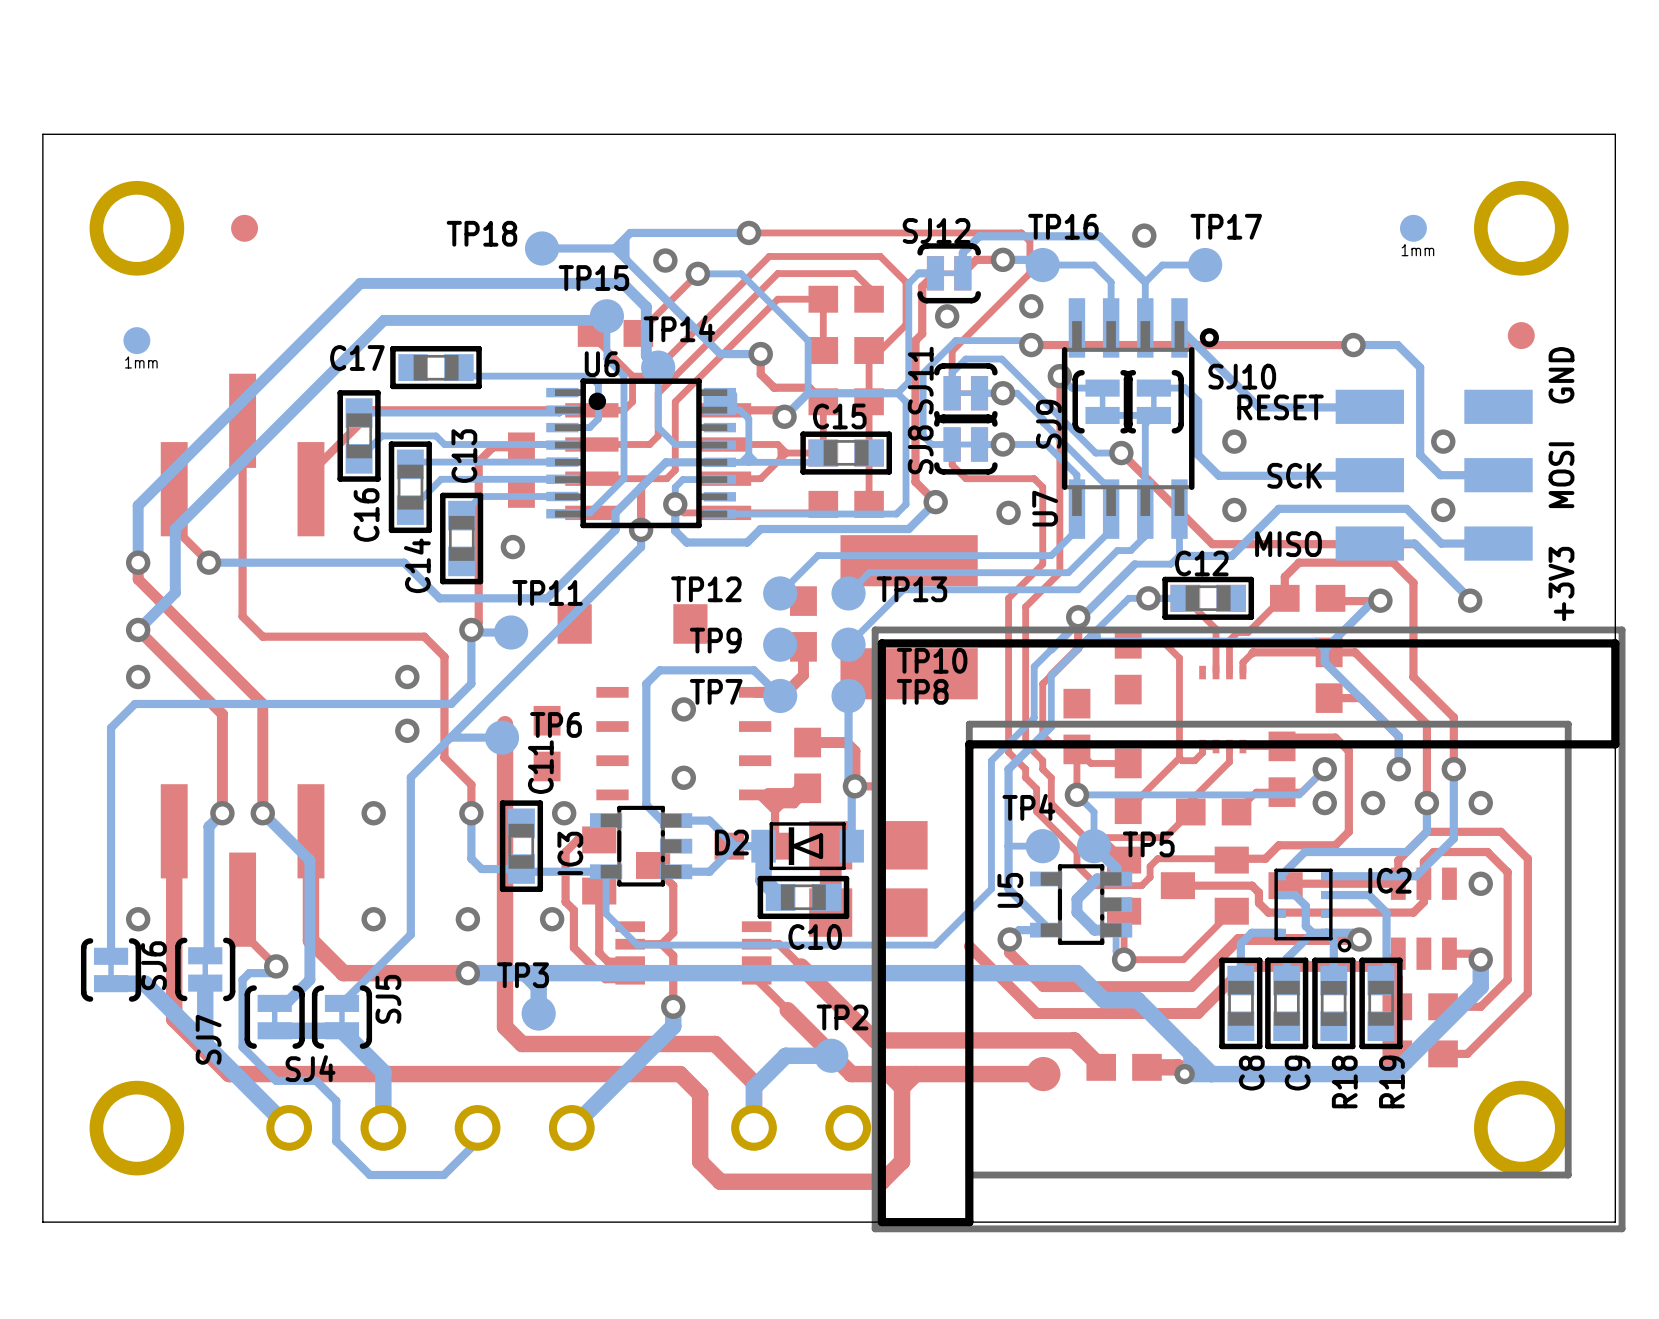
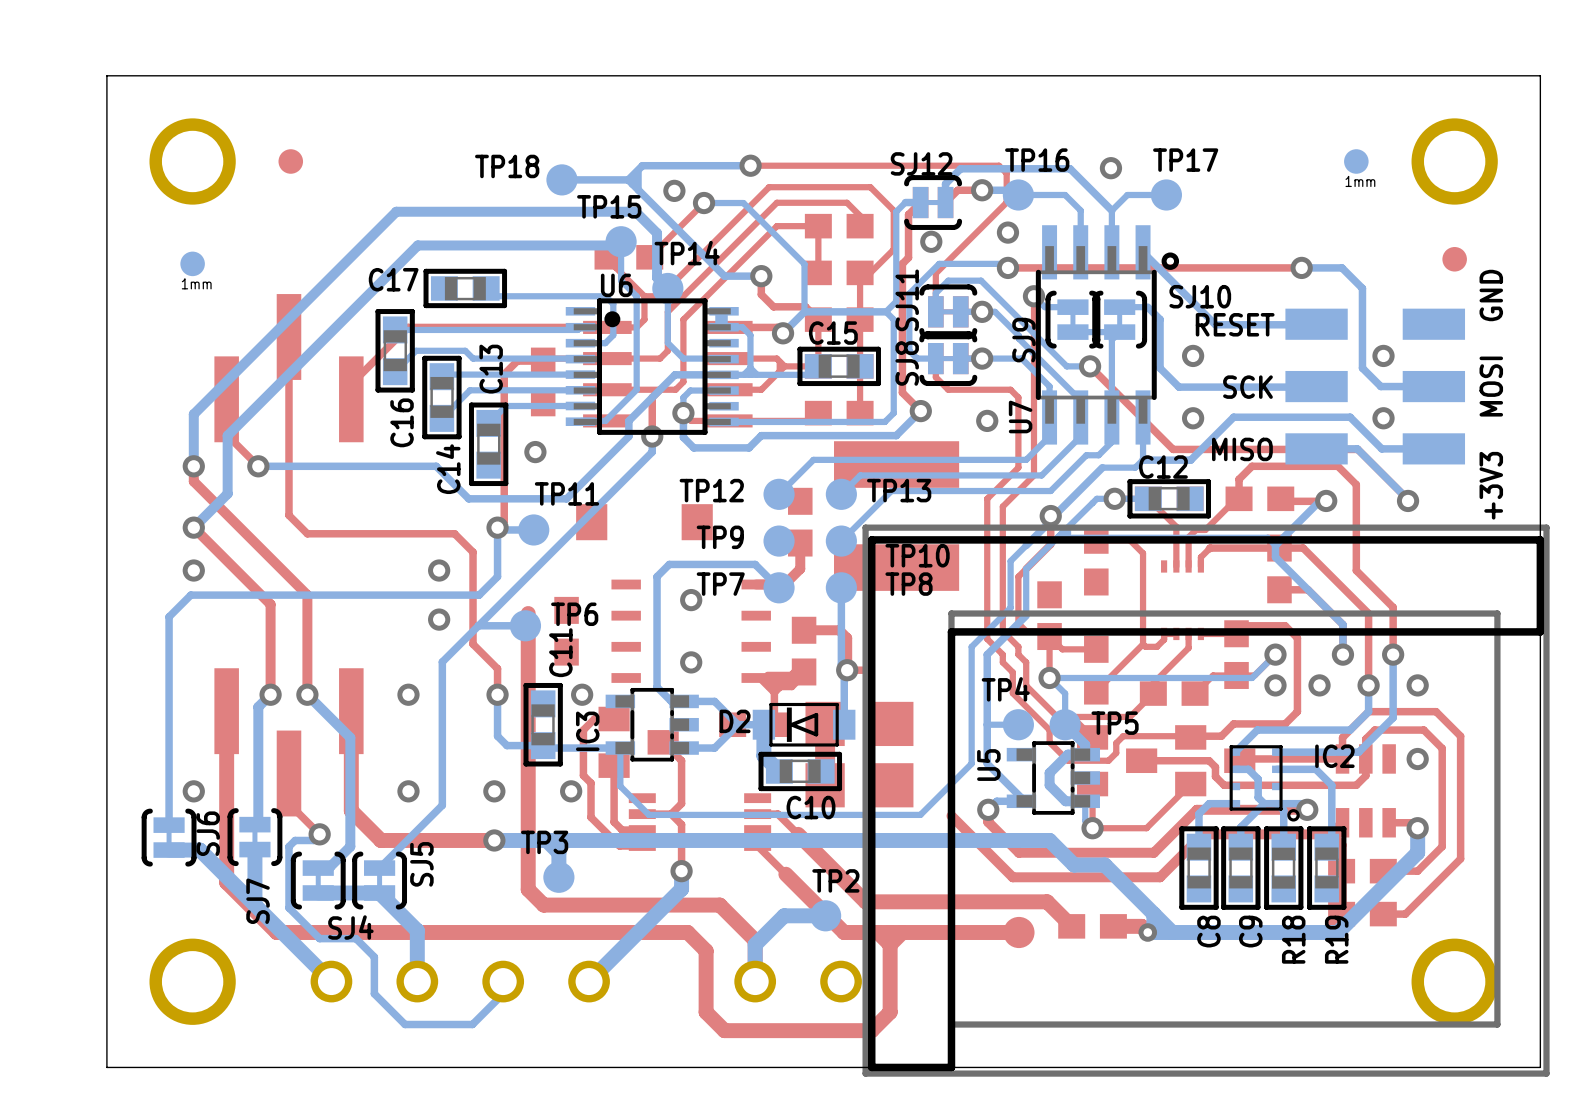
bottom track: (706, 394) (706, 407) -> none
bottom track: (727, 394) (727, 407) -> none
bottom track: (733, 394) (733, 407) -> none

